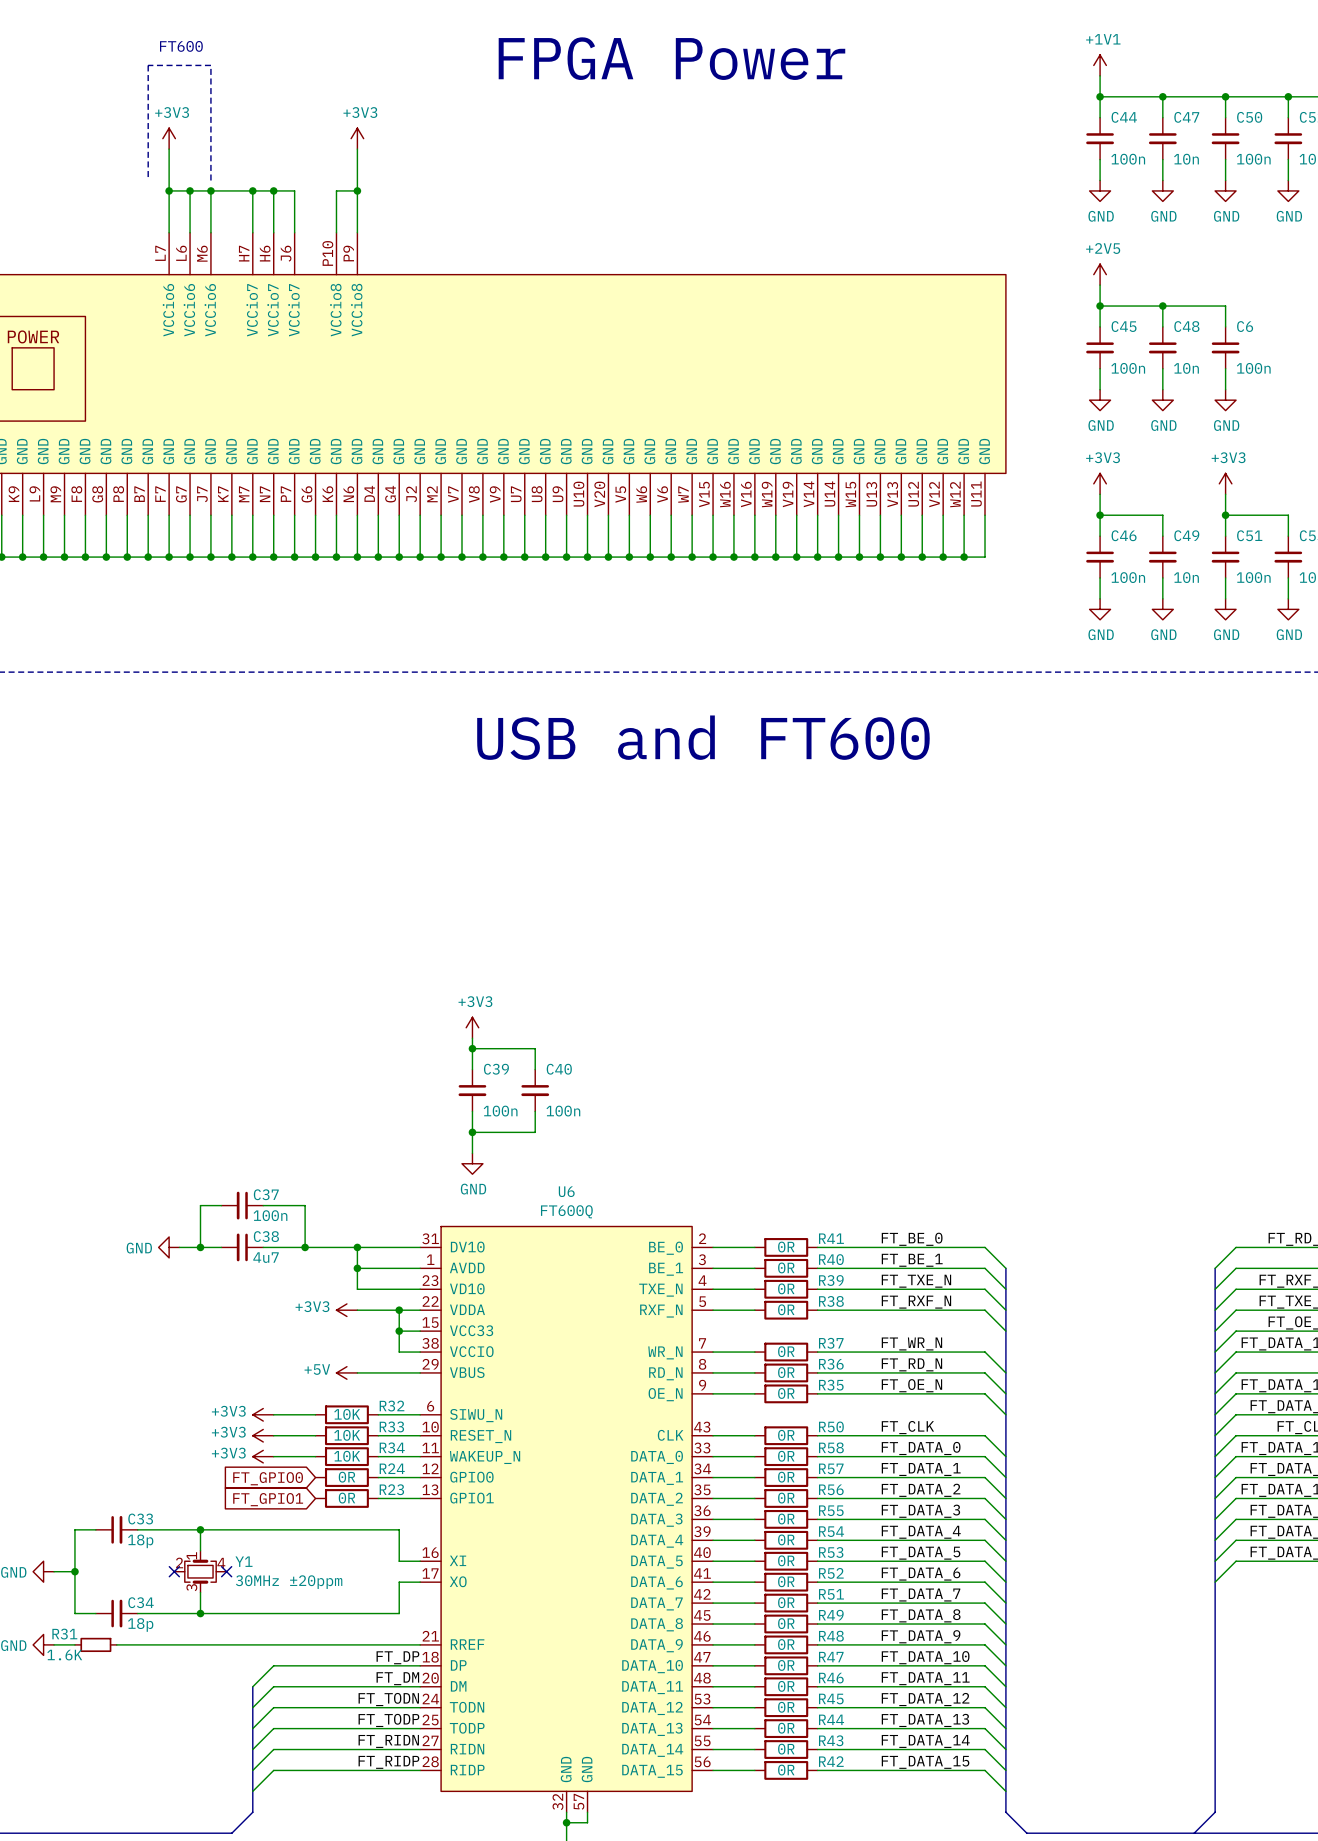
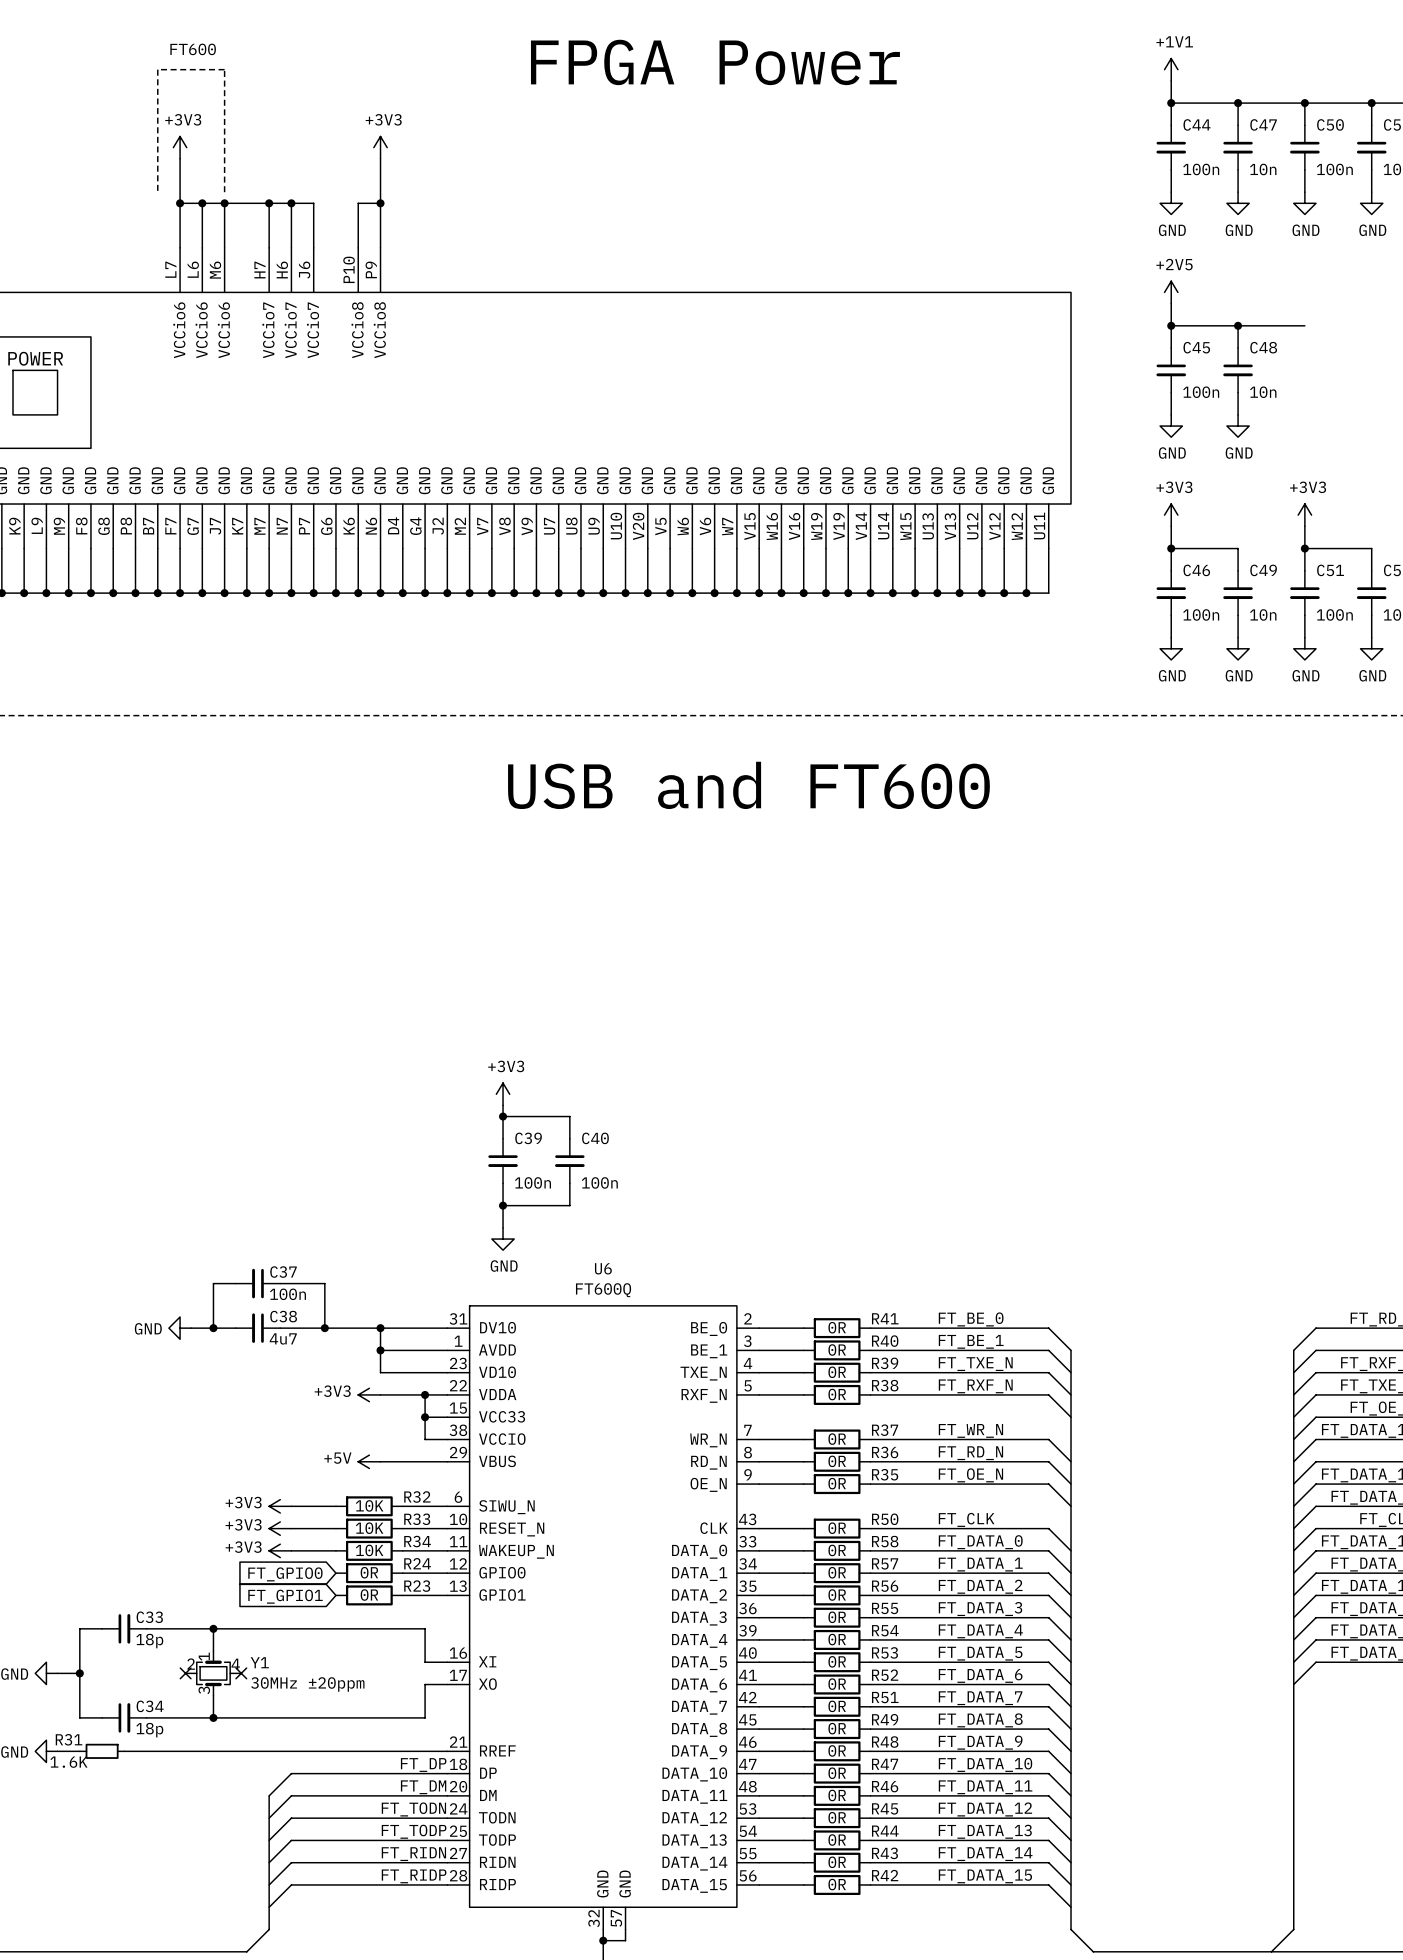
wire: (1225, 306) (1225, 326) -> none
C6: 100n (1225, 347) -> none
wire: (1225, 368) (1225, 389) -> none
power symbol: GND (1225, 400) -> none

